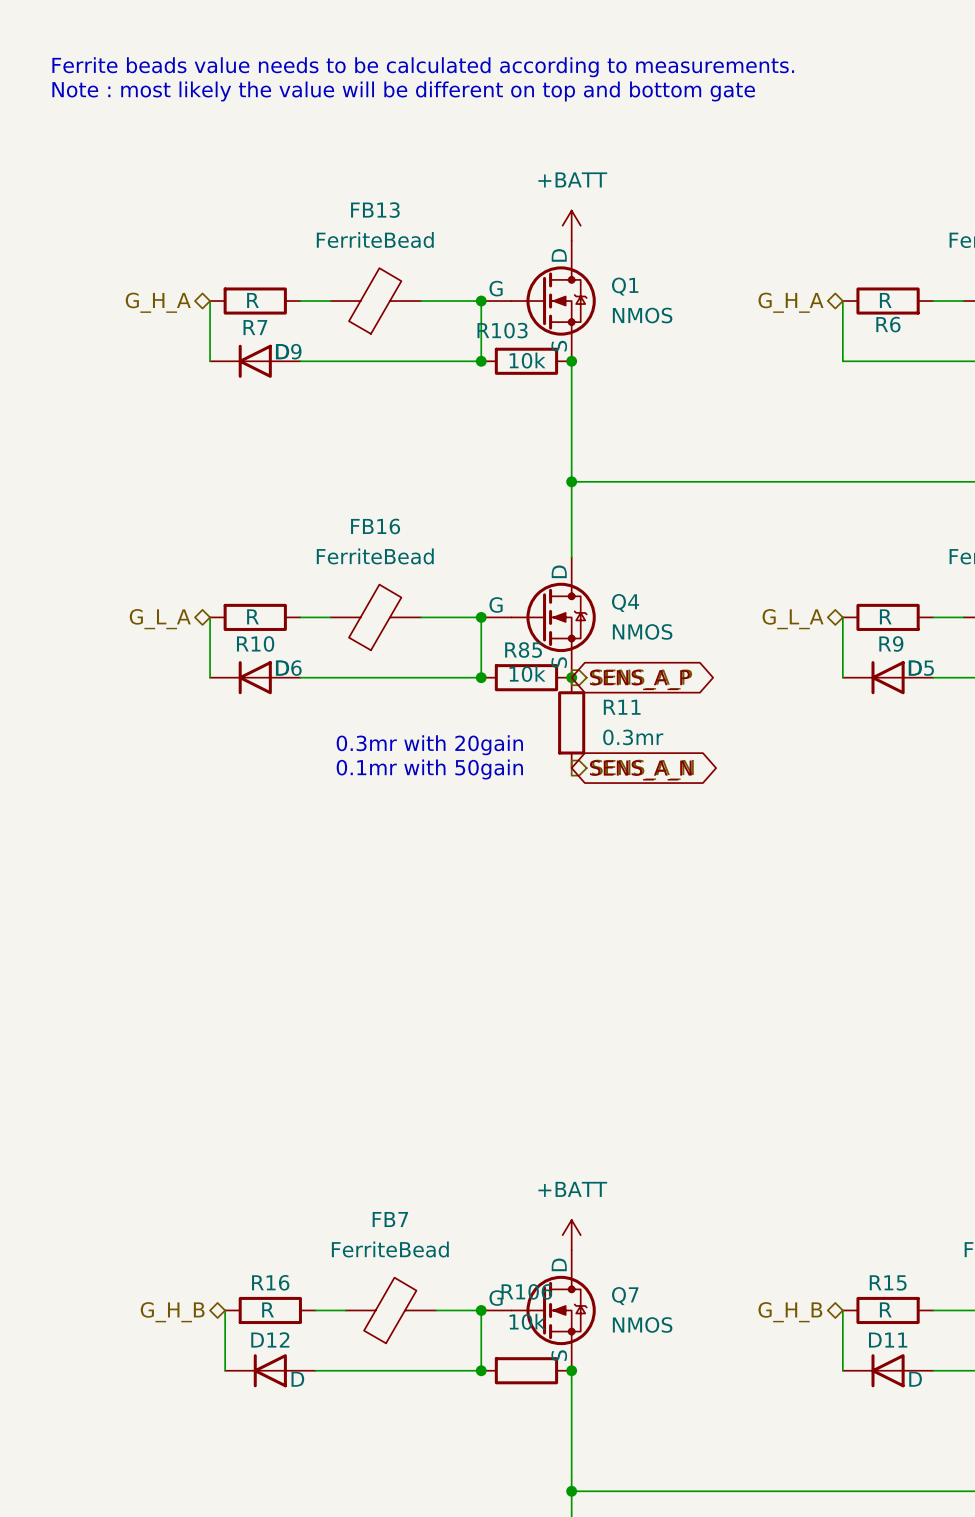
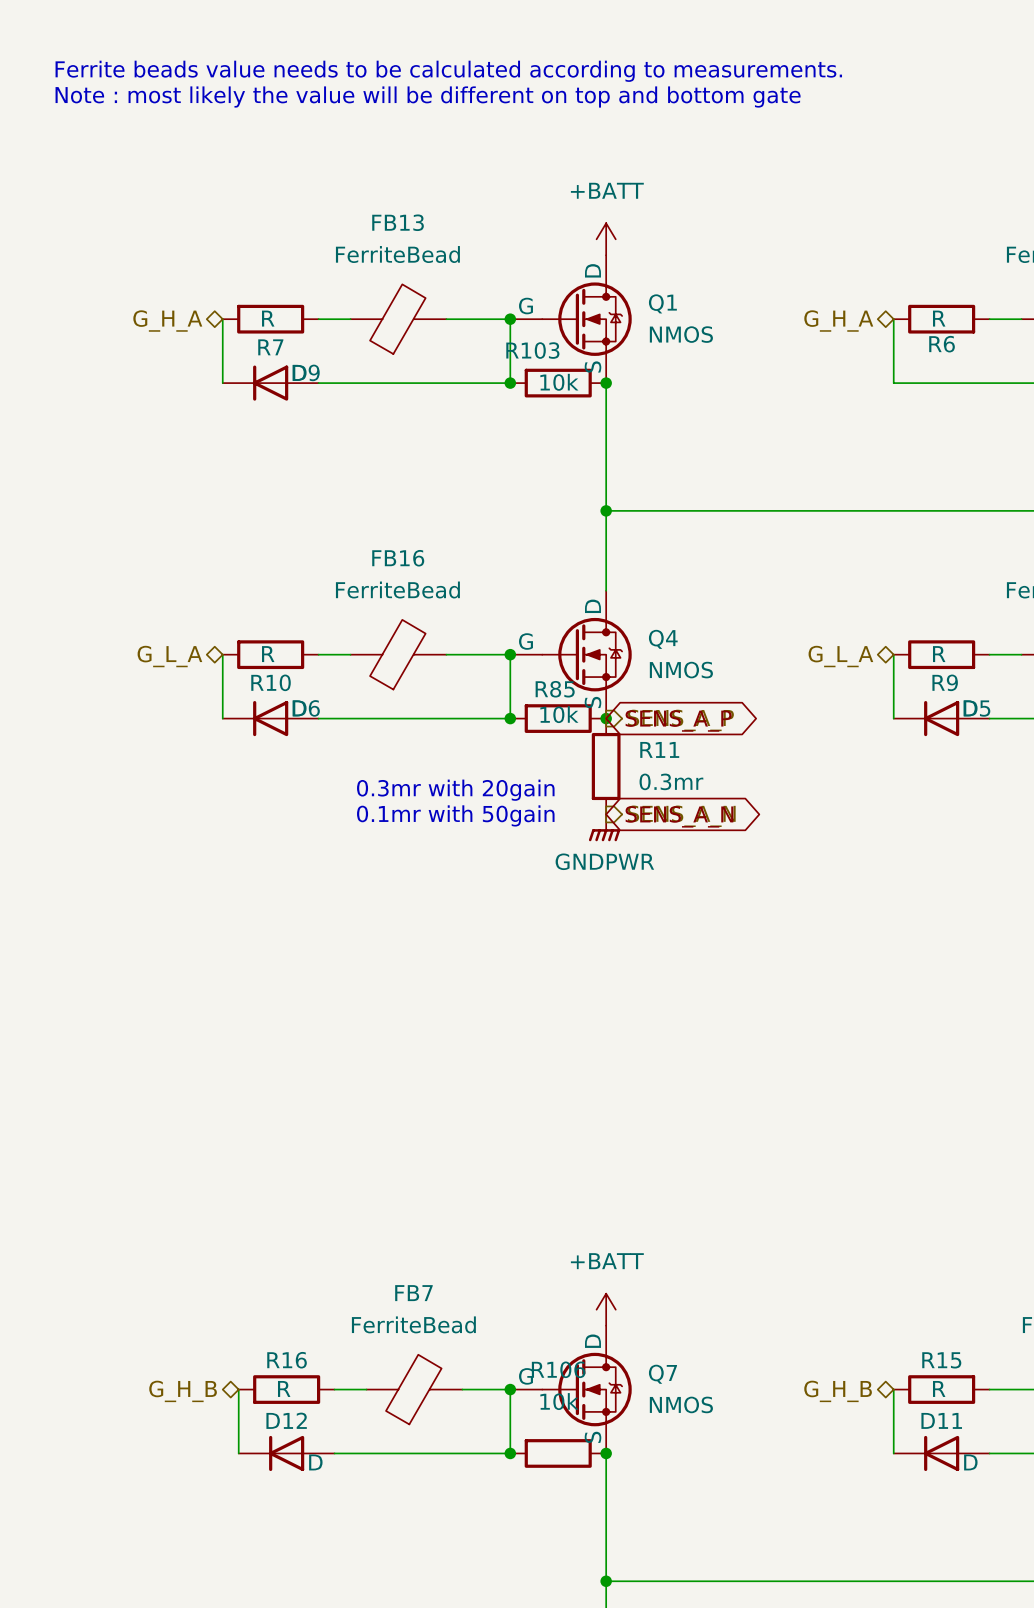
power symbol: none -> GNDPWR (604, 827)

